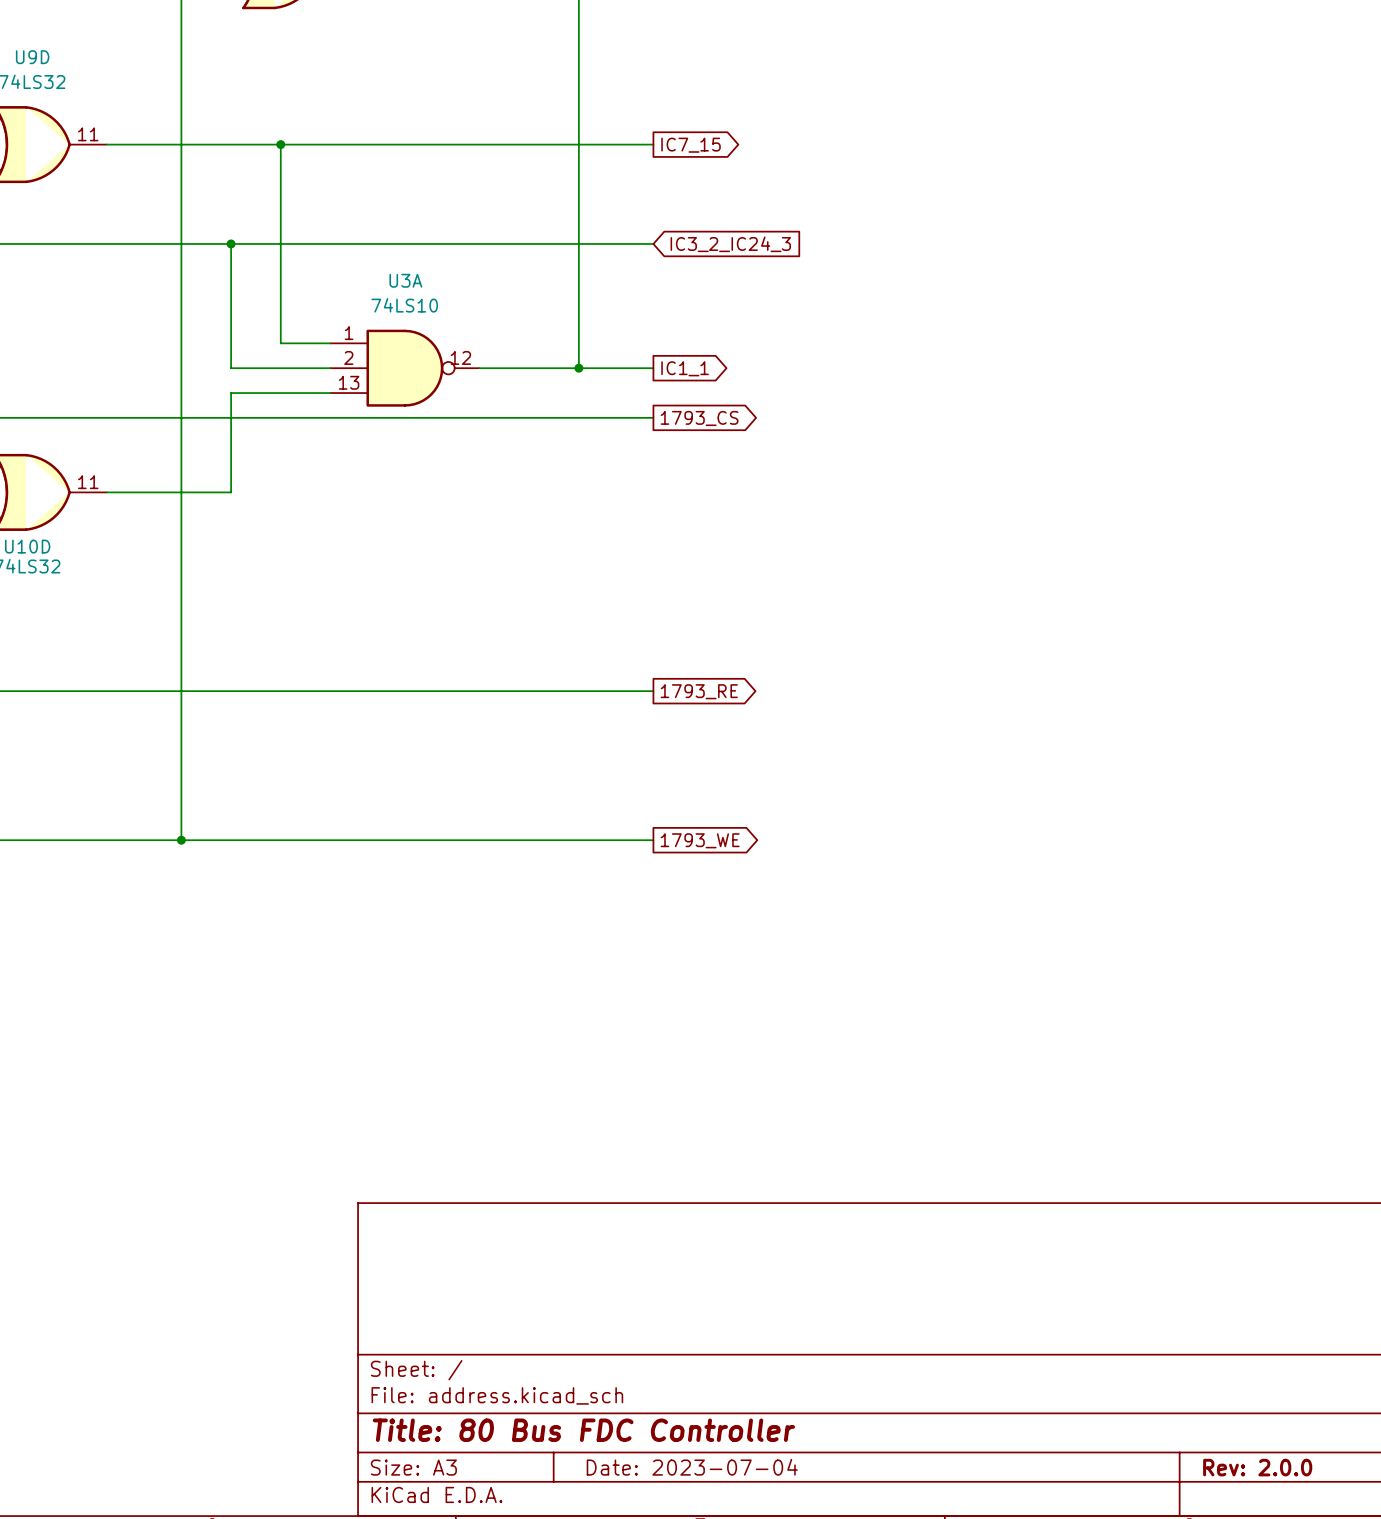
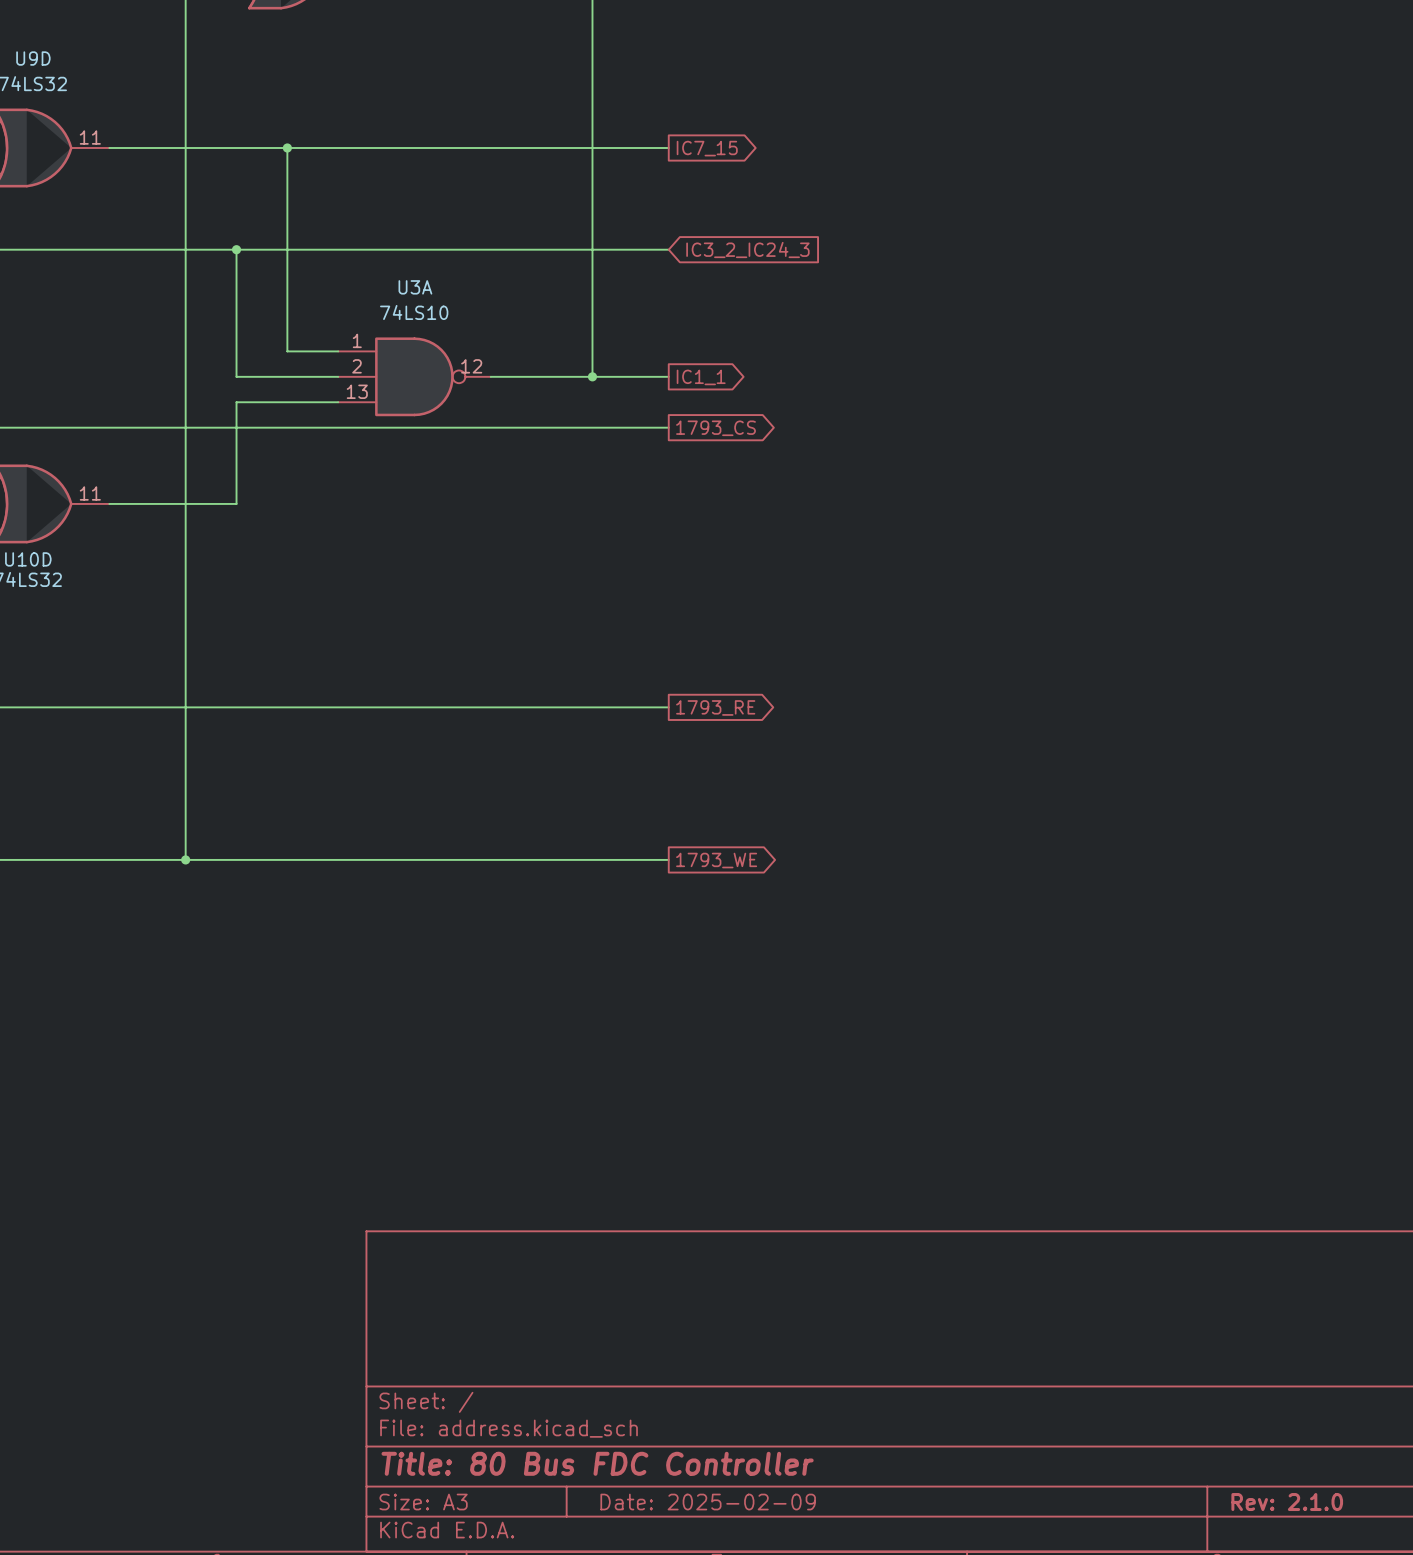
title block: Date: 2023-07-04 (692, 1467) -> Date: 2025-02-09 (708, 1502)
title block: Rev: 2.0.0 (1257, 1467) -> Rev: 2.1.0 (1287, 1502)

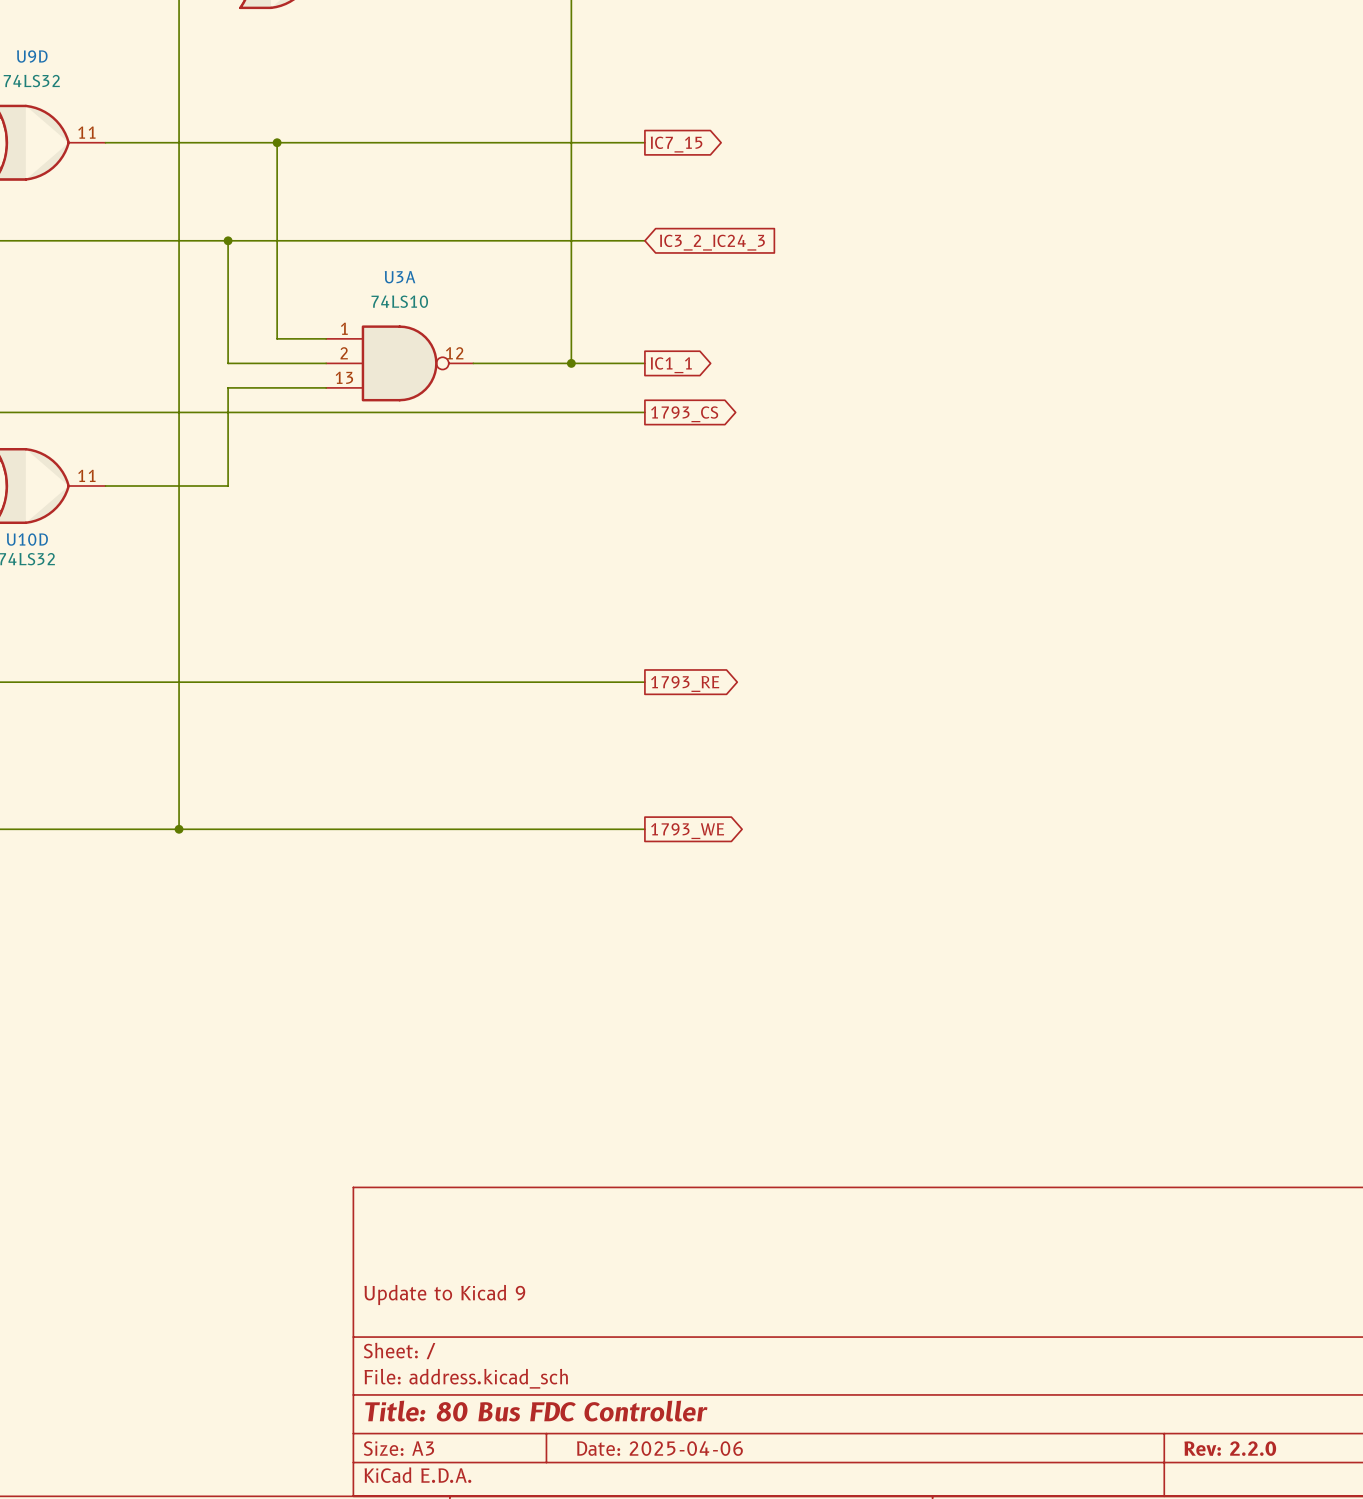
title block: none -> Update to Kicad 9 (444, 1294)
title block: Date: 2025-02-09 (708, 1502) -> Date: 2025-04-06 (659, 1448)
title block: Rev: 2.1.0 (1287, 1502) -> Rev: 2.2.0 (1230, 1448)

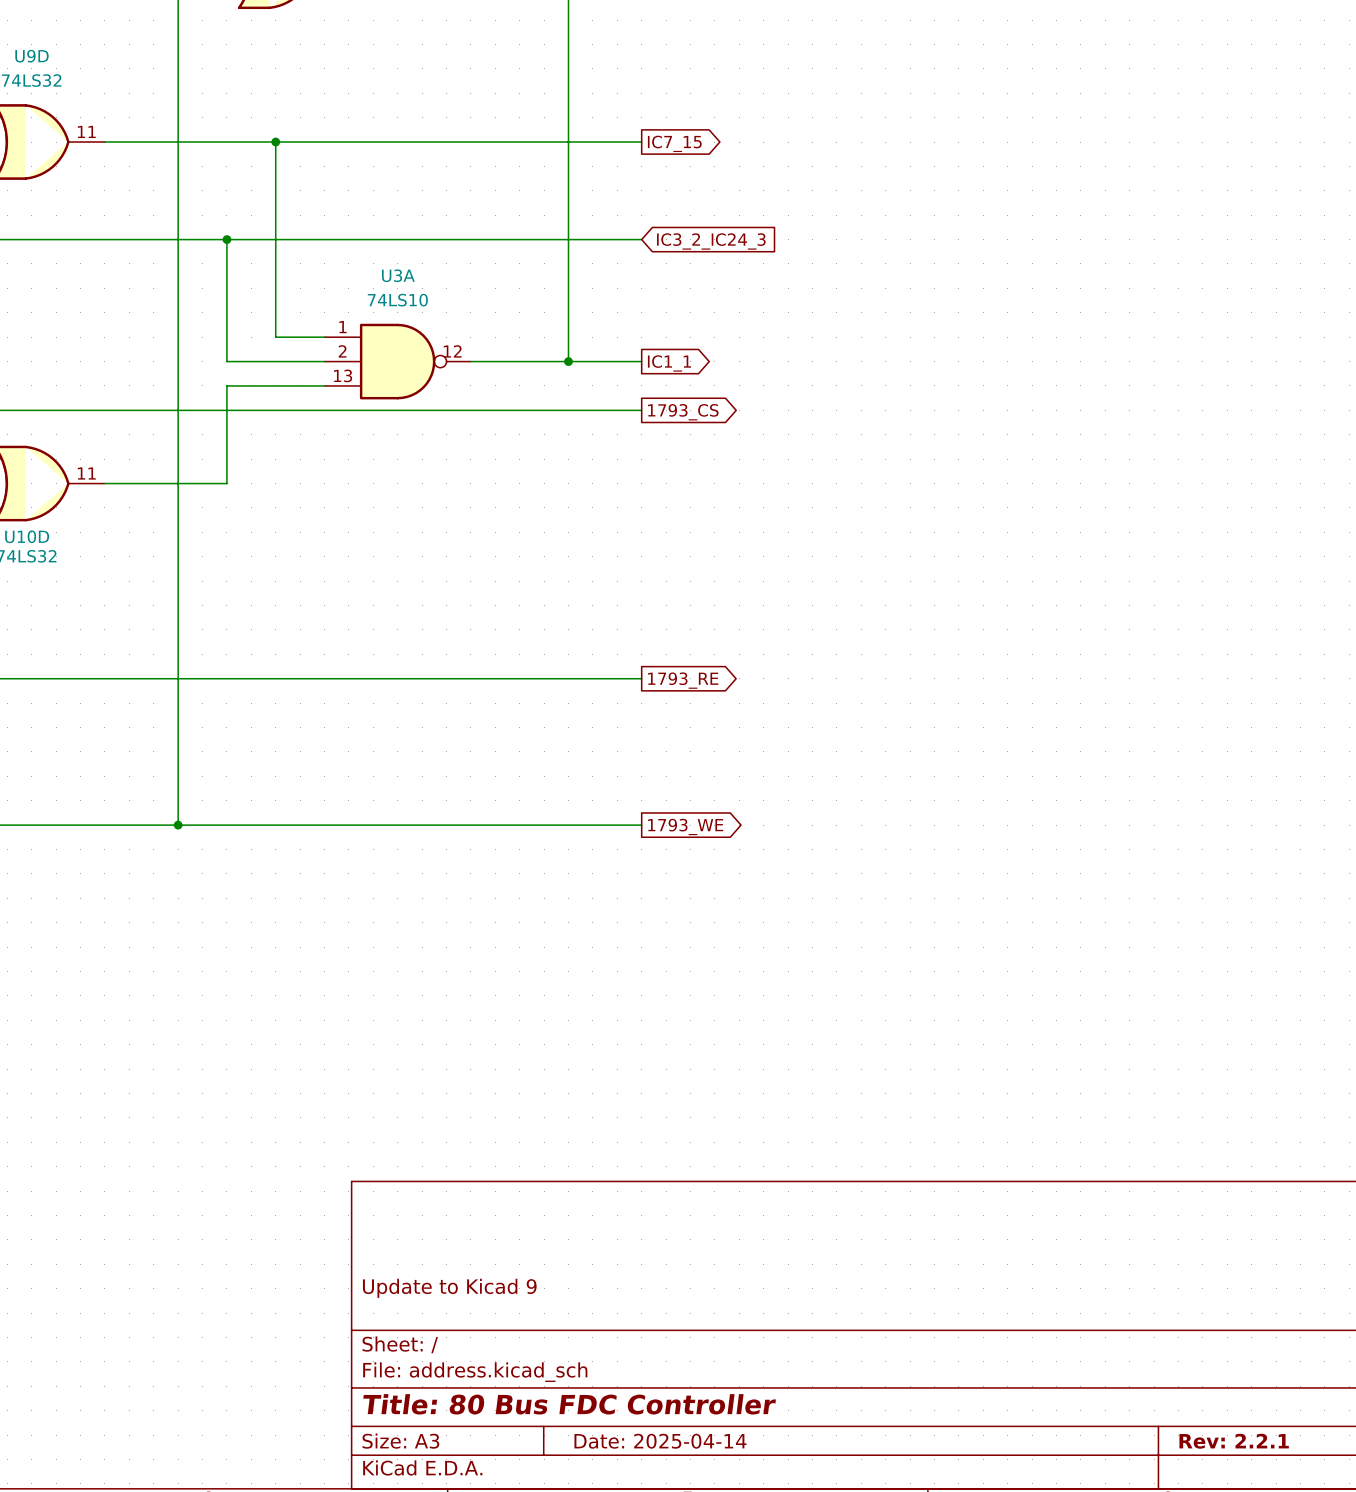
title block: Date: 2025-04-06 (659, 1448) -> Date: 2025-04-14 (660, 1441)
title block: Rev: 2.2.0 (1230, 1448) -> Rev: 2.2.1 (1234, 1441)

